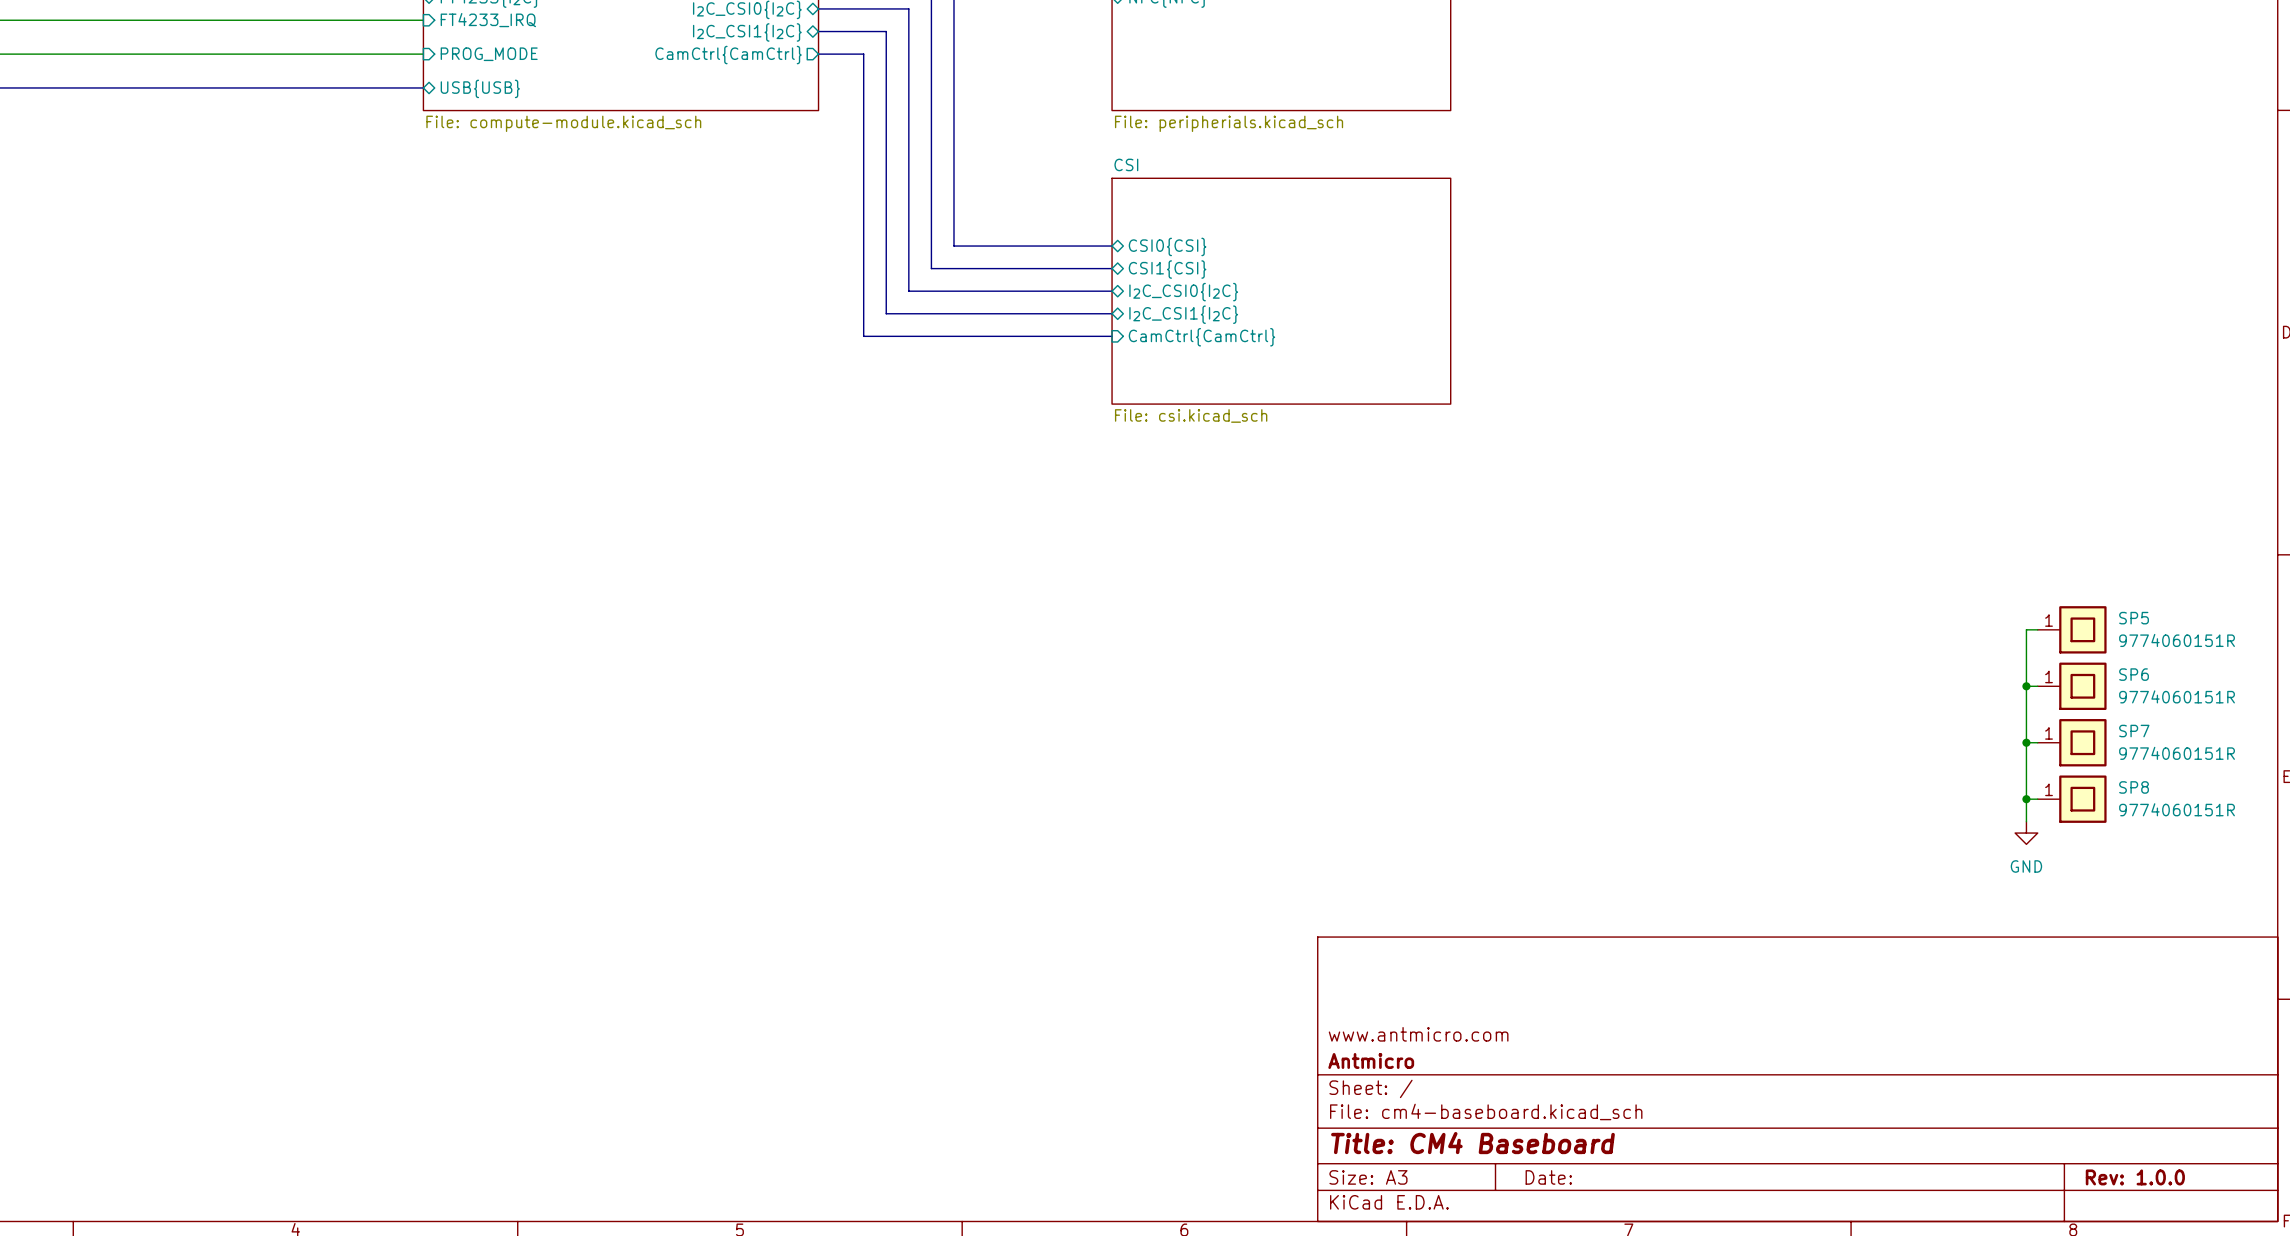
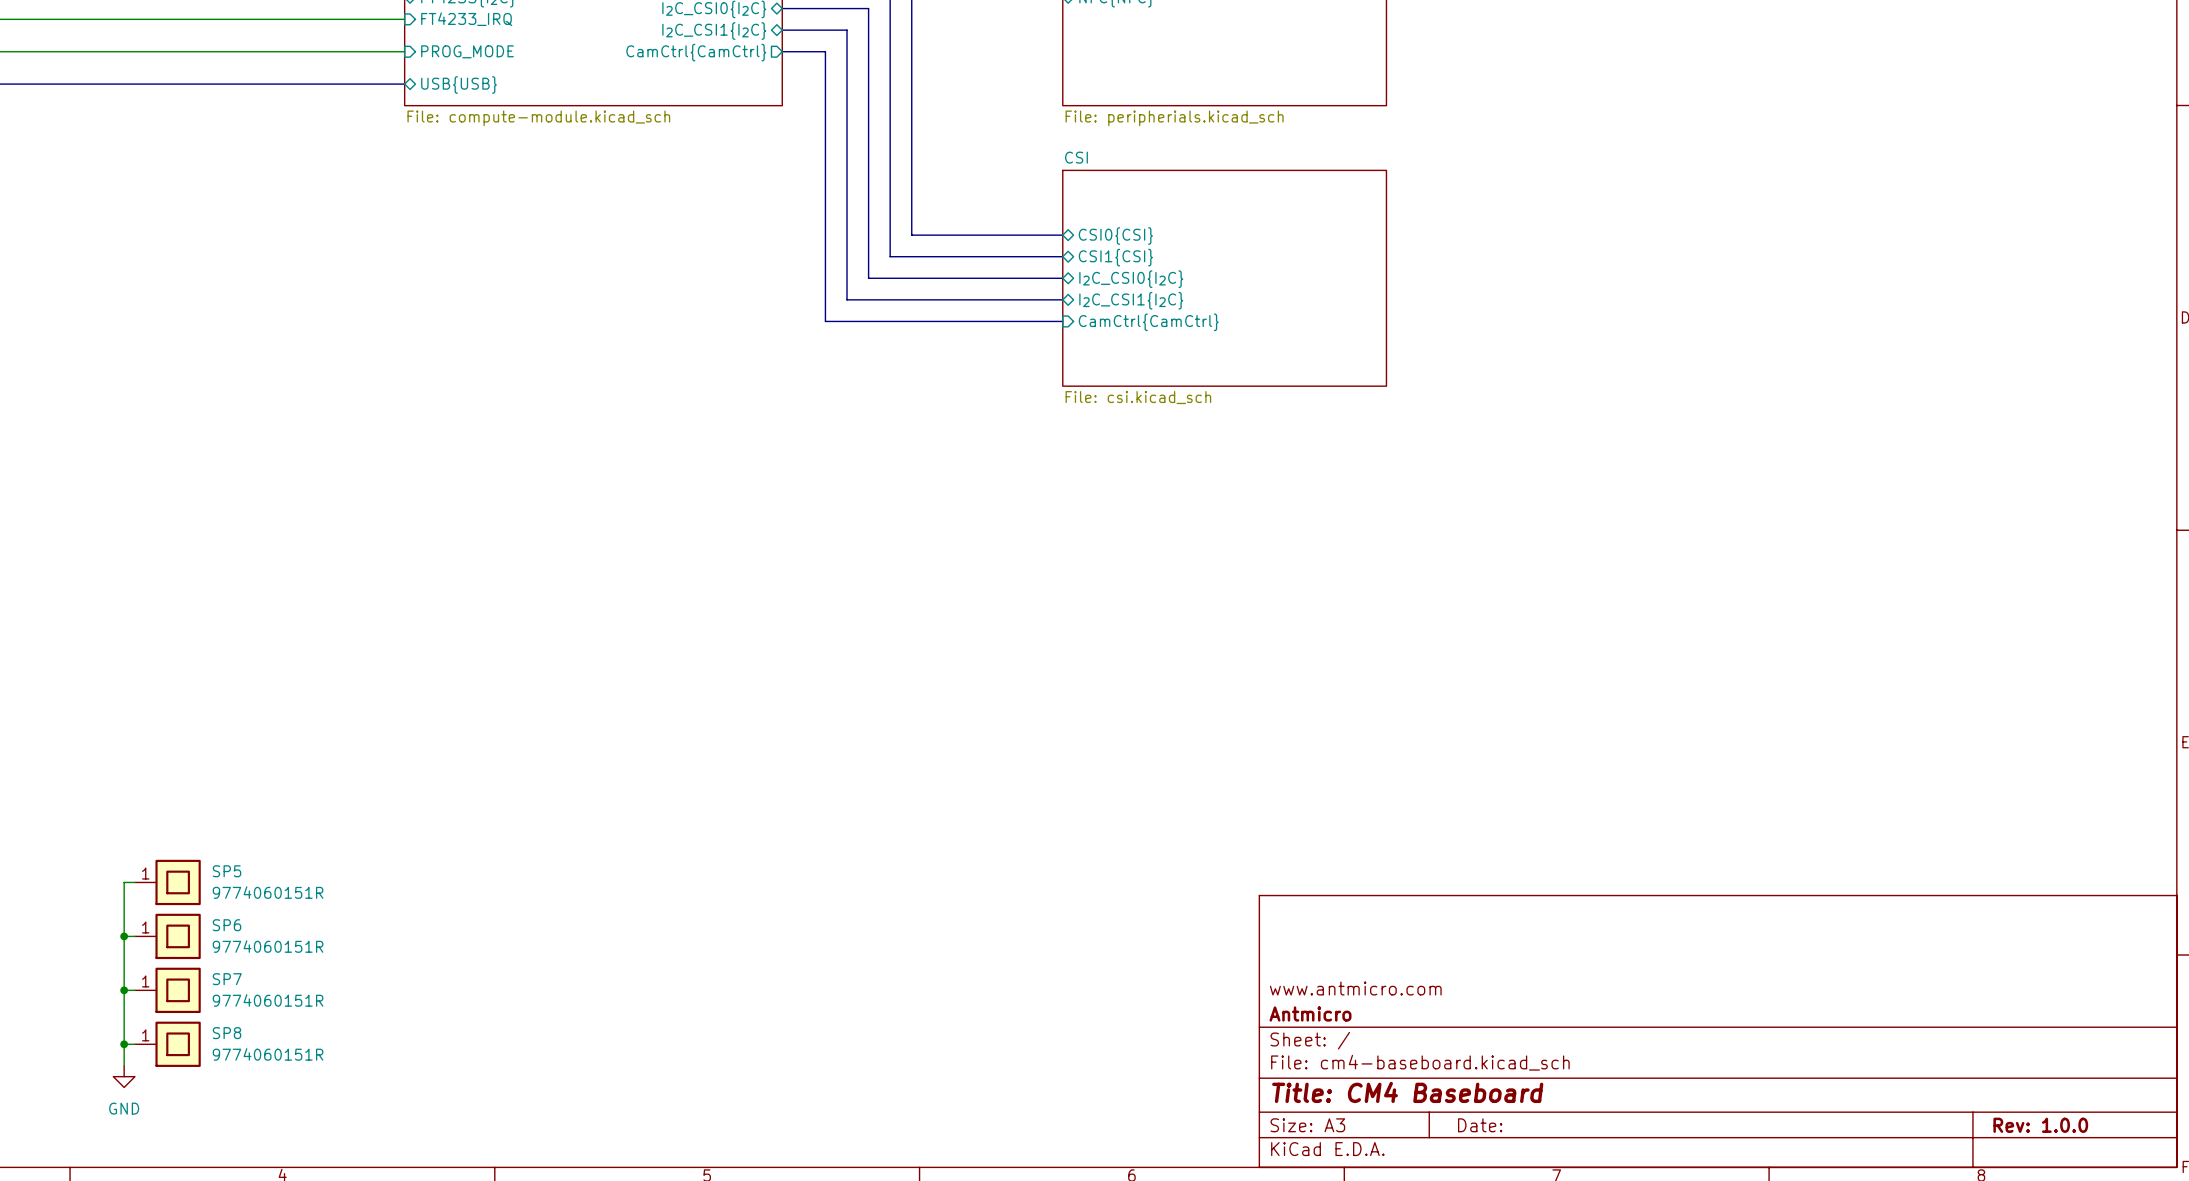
wire: (2037, 629) (2026, 629) (2026, 821) -> none
SP5 position: (2072, 629) -> (167, 882)
wire: (2026, 686) (2037, 686) -> none
junction: (2026, 686) -> none
SP6 position: (2072, 686) -> (167, 936)
wire: (2026, 742) (2037, 742) -> none
junction: (2026, 742) -> none
SP7 position: (2072, 742) -> (167, 990)
wire: (2026, 799) (2037, 799) -> none
junction: (2026, 799) -> none
SP8 position: (2072, 799) -> (167, 1044)
power symbol: GND (2026, 833) -> none
wire: none -> (134, 882) (124, 882) (124, 1065)
wire: none -> (124, 936) (134, 936)
junction: none -> (124, 936)
wire: none -> (124, 990) (134, 990)
junction: none -> (124, 990)
wire: none -> (124, 1044) (134, 1044)
junction: none -> (124, 1044)
power symbol: none -> GND (124, 1076)

